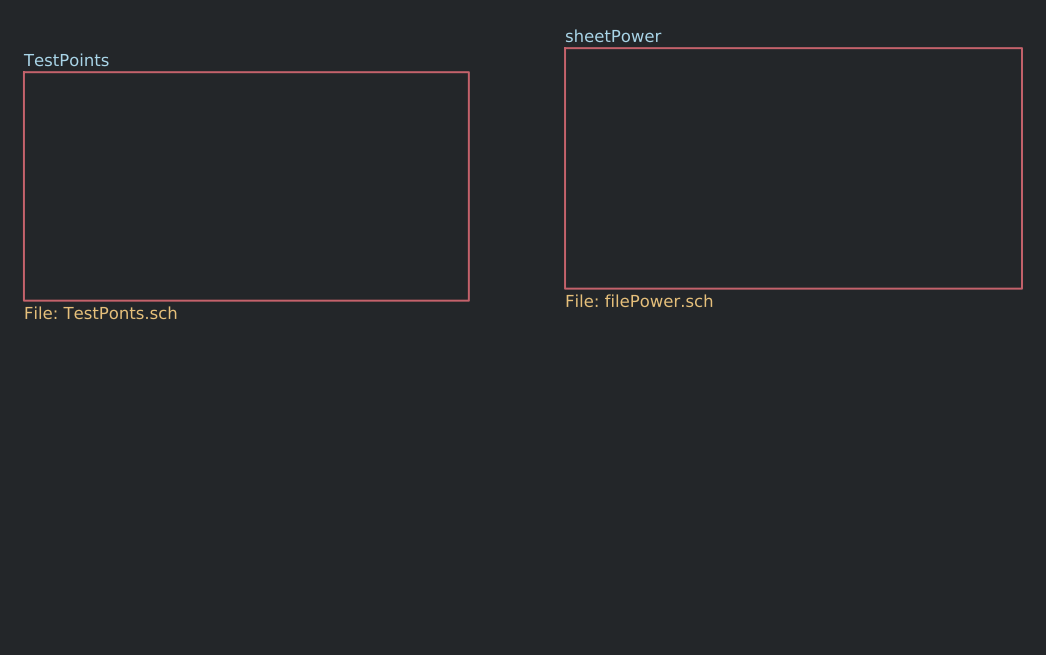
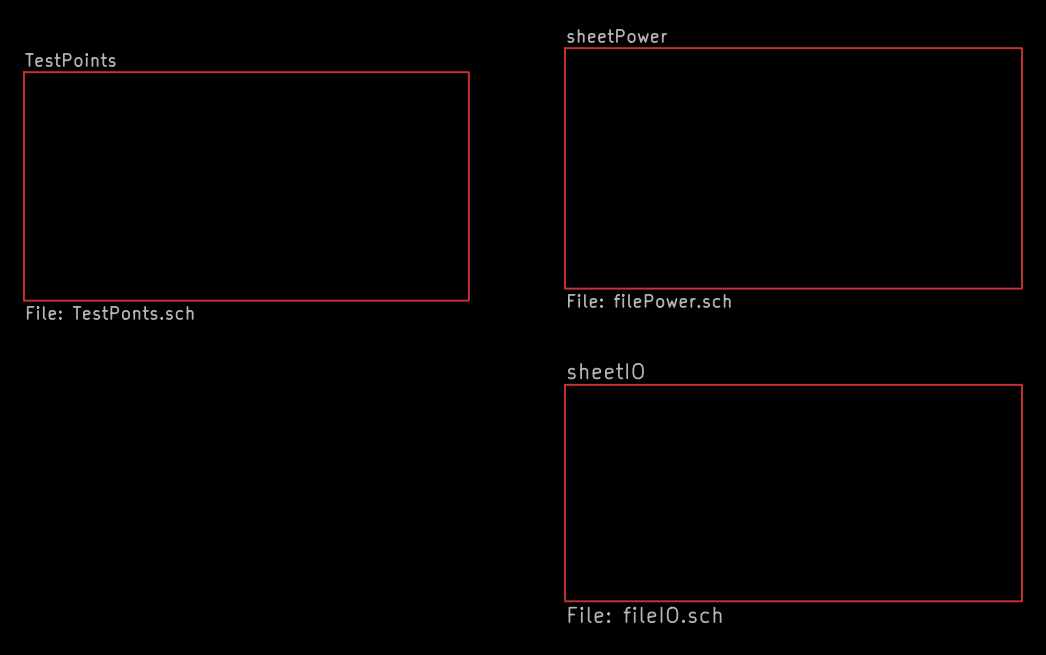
sheet sheetIO: none -> File: fileIO.sch (793, 493)

